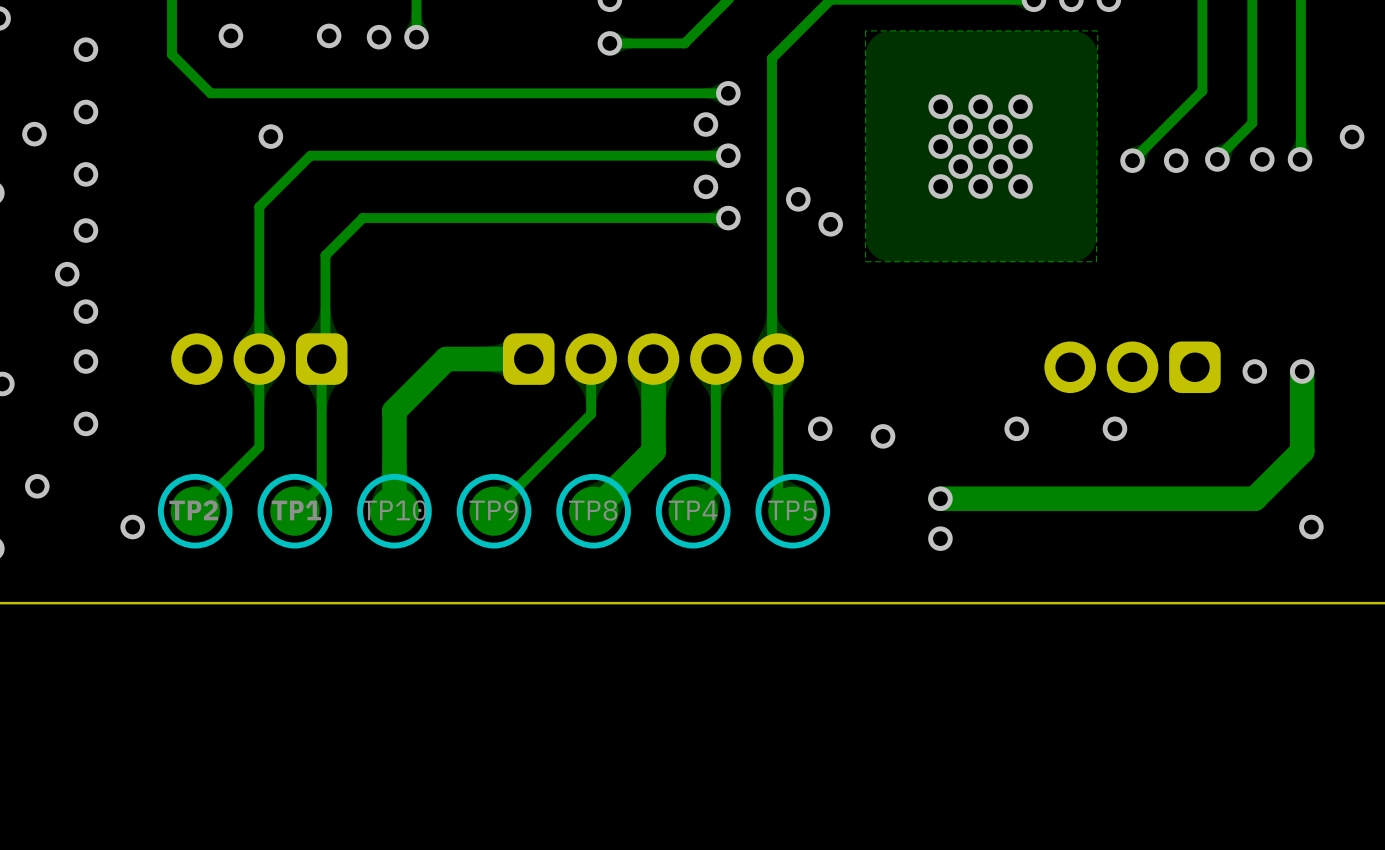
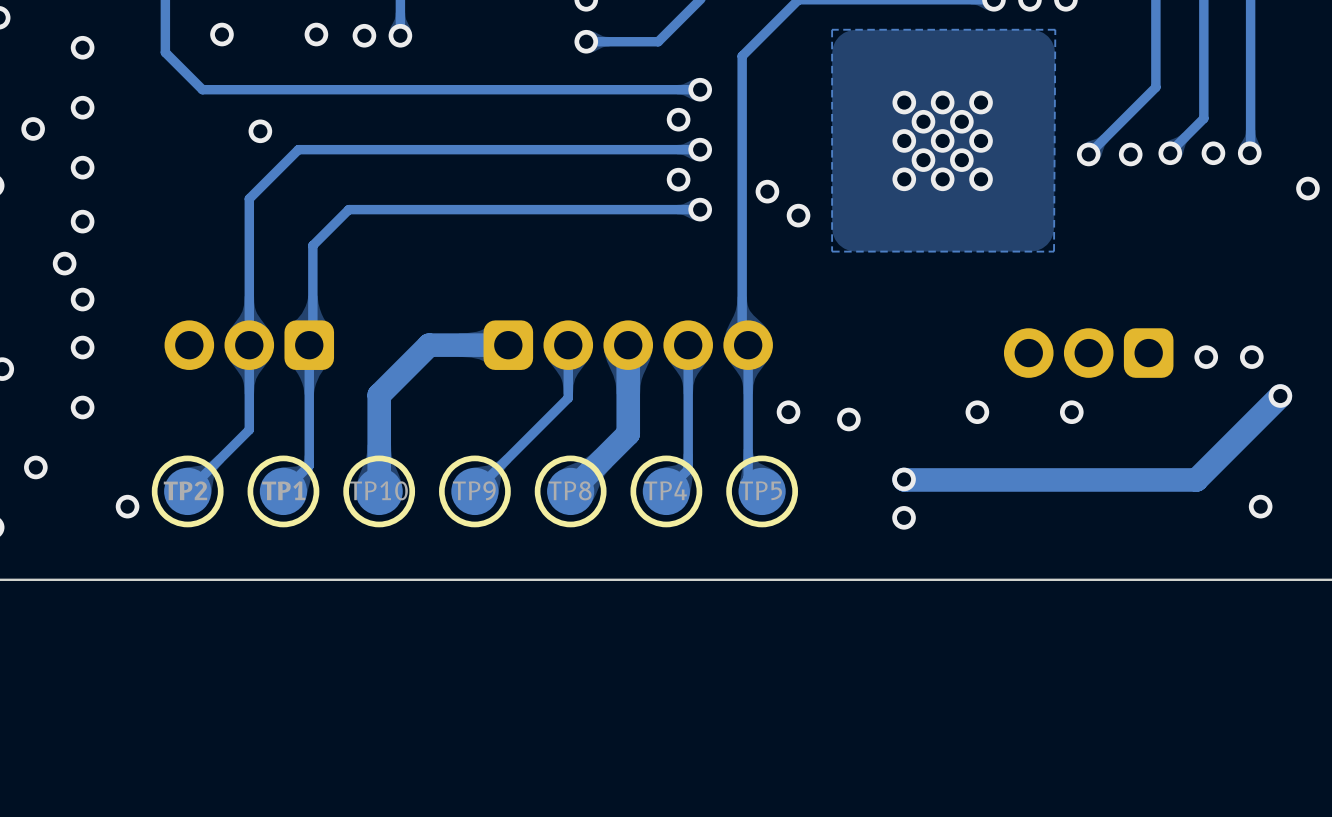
via: (1352, 136) -> none
via: none -> (1307, 188)
track: (1302, 371) (1302, 451) (1254, 498) (940, 498) -> (1280, 396) (1196, 479) (904, 479)
via: none -> (1280, 396)

